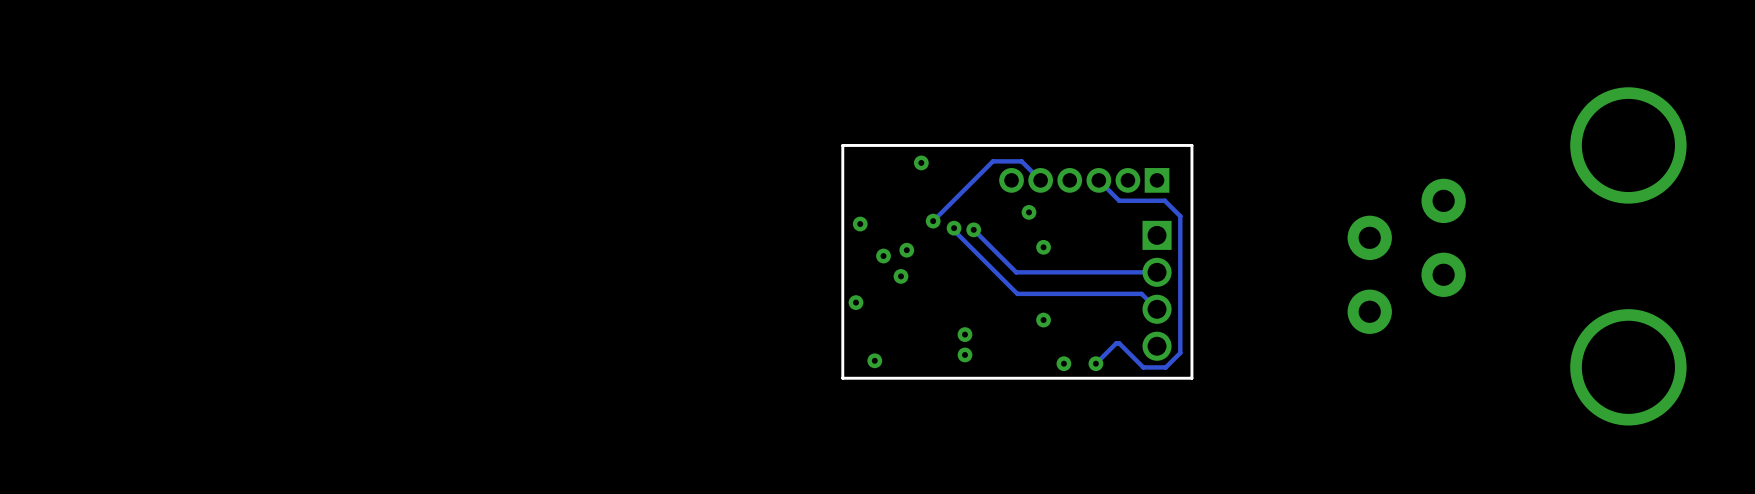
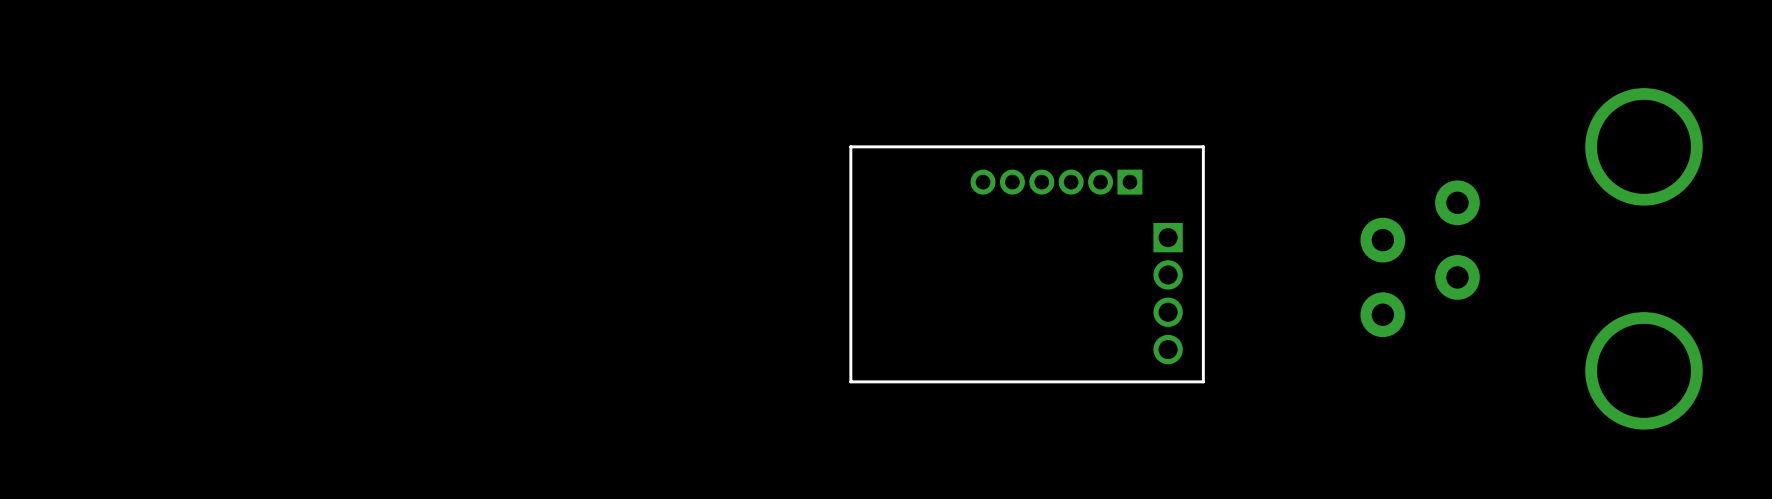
via: (921, 162) -> none
track: (1040, 180) (1021, 161) (992, 161) (933, 221) -> none
part position: (1084, 180) -> (1056, 182)
track: (1098, 180) (1119, 200) (1164, 200) (1180, 216) (1180, 352) (1165, 367) (1143, 367) (1119, 343) (1116, 343) (1095, 363) -> none
via: (1029, 212) -> none
via: (933, 221) -> none
via: (860, 224) -> none
track: (954, 228) (954, 230) (1017, 293) (1141, 293) (1157, 309) -> none
via: (954, 228) -> none
track: (973, 229) (1016, 272) (1157, 272) -> none
via: (973, 229) -> none
via: (1043, 247) -> none
via: (906, 250) -> none
via: (883, 256) -> none
via: (900, 276) -> none
via: (855, 302) -> none
via: (1043, 320) -> none
via: (964, 334) -> none
via: (964, 354) -> none
via: (874, 360) -> none
via: (1063, 363) -> none
via: (1095, 363) -> none

